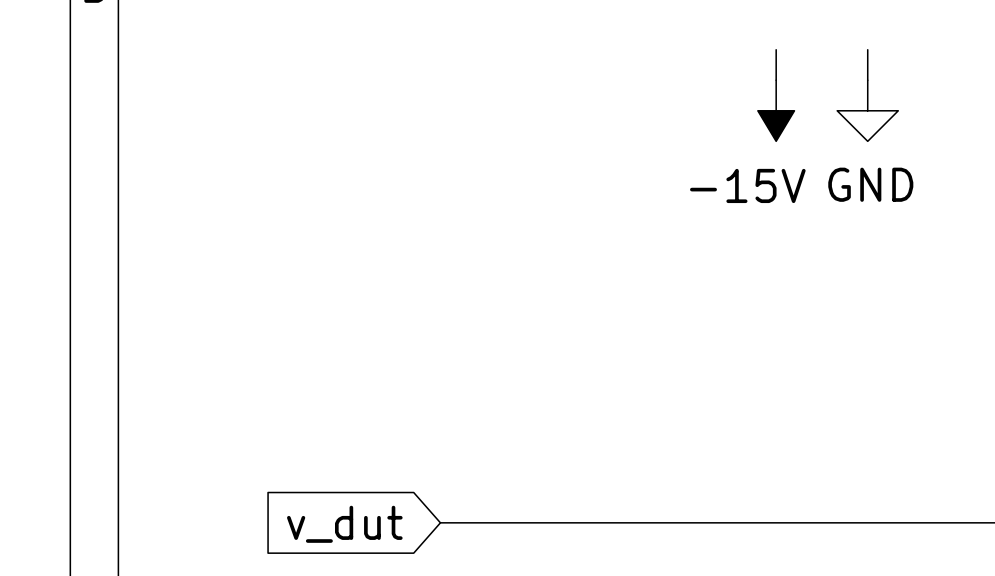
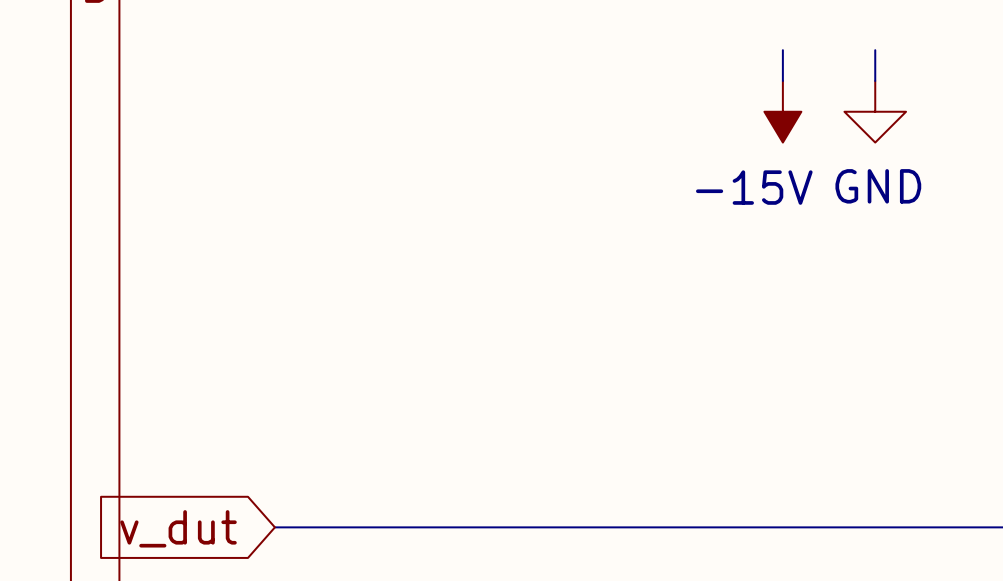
wire: none -> (274, 527) (444, 527)
global label position: v_dut (344, 524) -> v_dut (178, 528)

